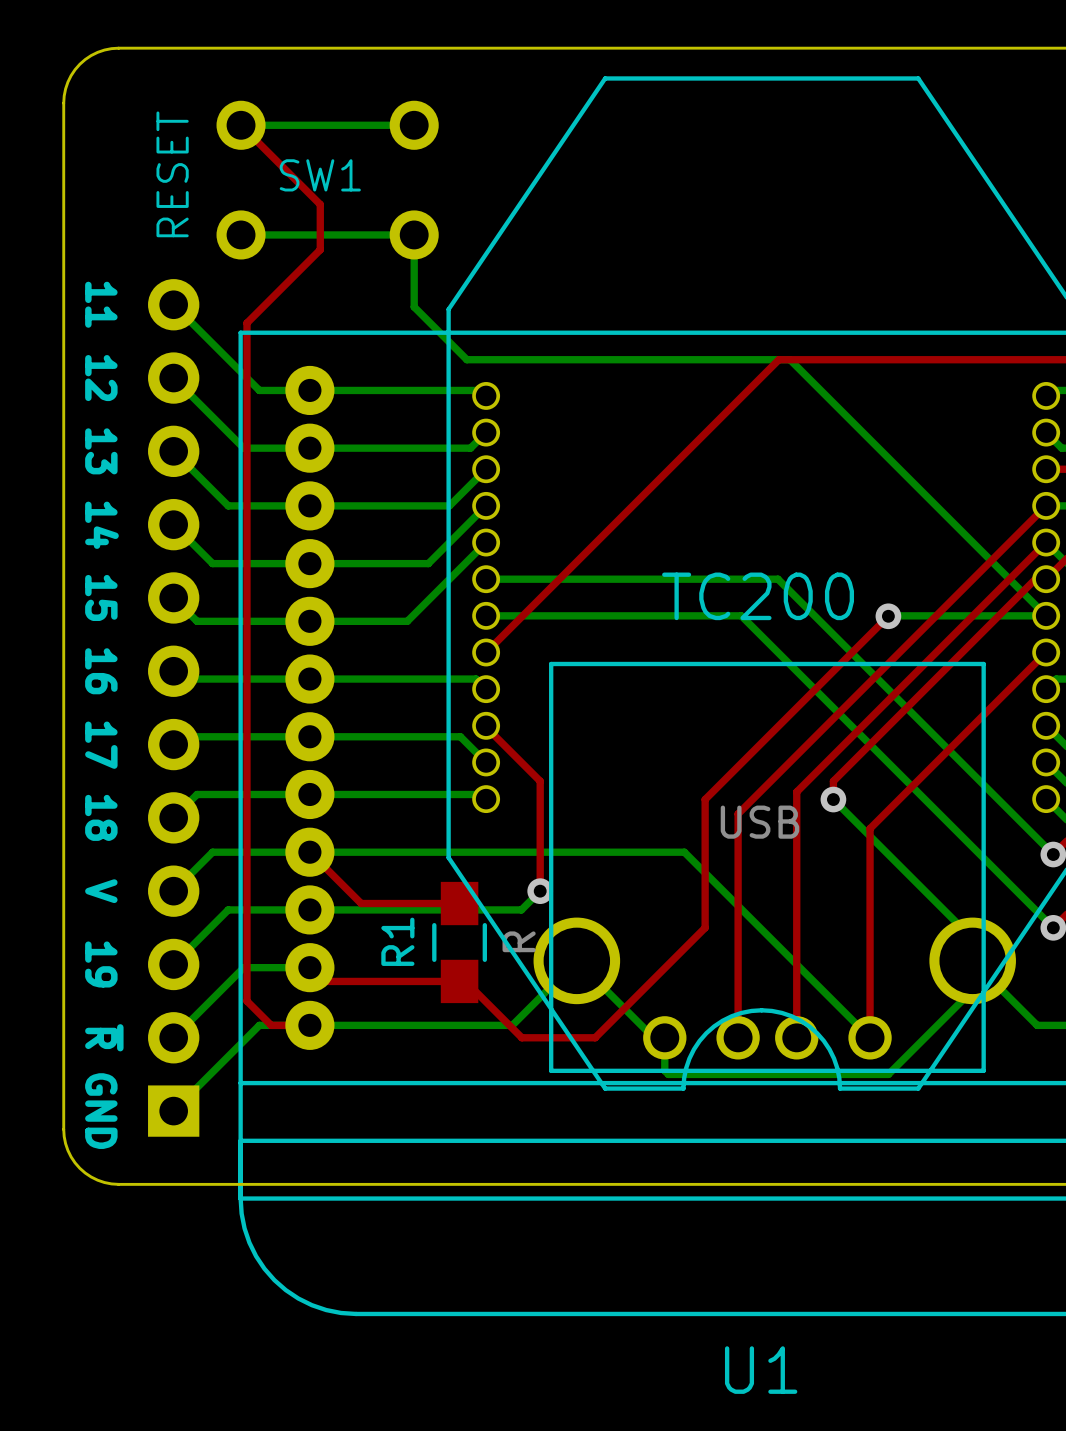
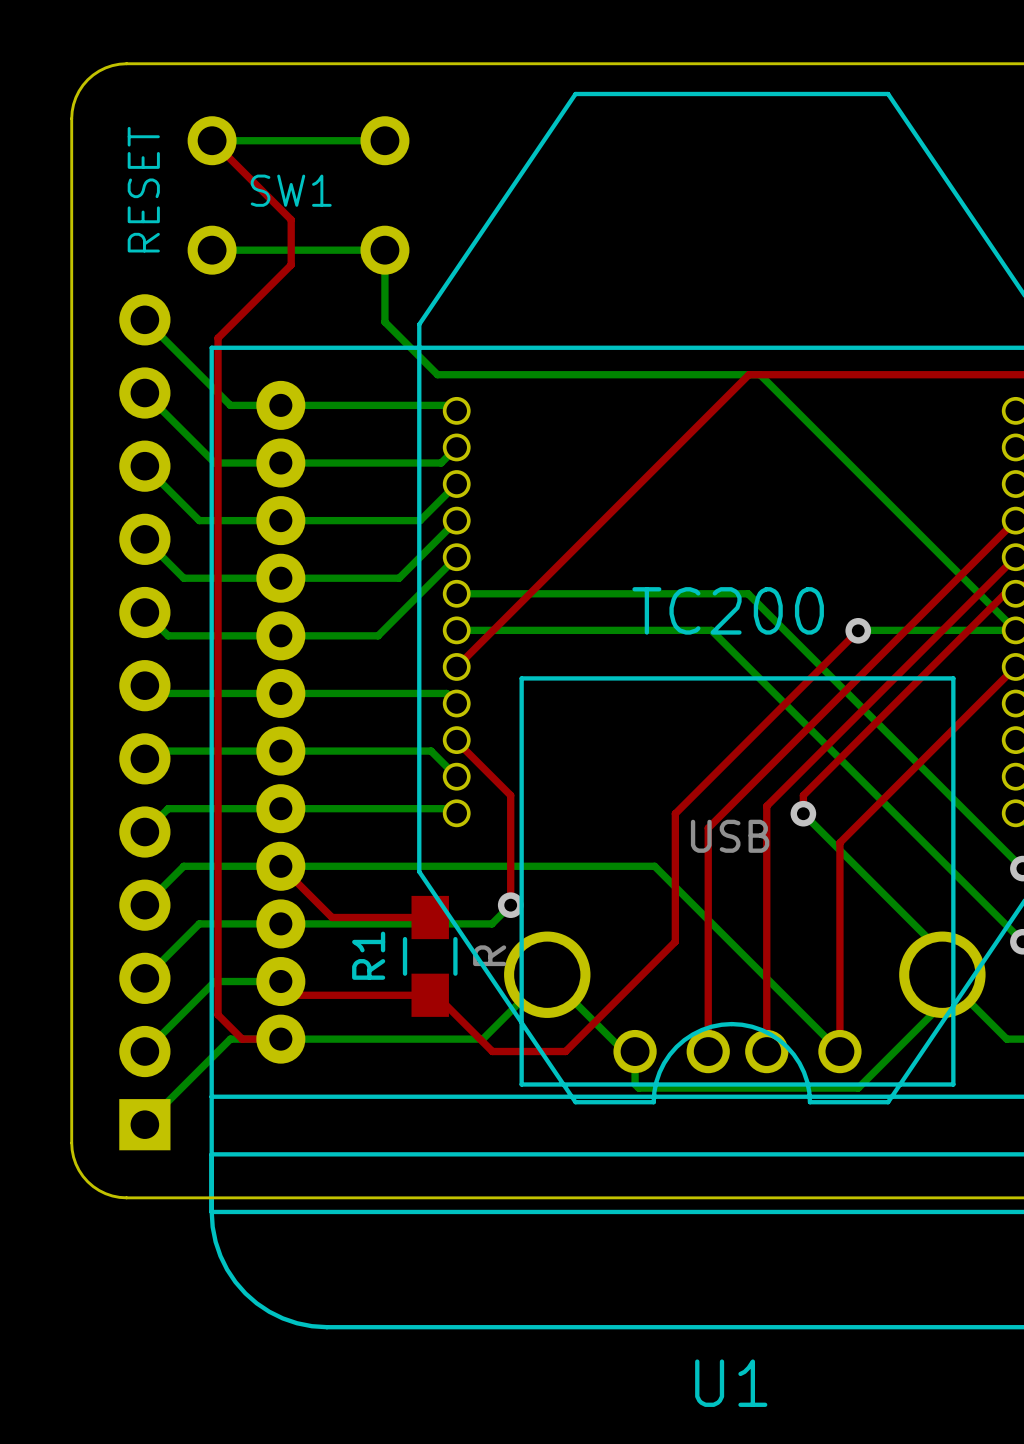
board edge: (155, 48) (111, 48) (91, 55) (79, 64) (71, 75) (65, 88) (63, 103) (64, 1136) (71, 1156) (79, 1168) (91, 1177) (111, 1183) (155, 1184) -> (126, 63) (105, 67) (87, 79) (75, 97) (71, 118) (71, 1142) (75, 1163) (87, 1181) (105, 1193) (126, 1197)
text: 11 (101, 304) -> none
text: 12 (101, 378) -> none
text: 13 (101, 451) -> none
text: 14 (101, 525) -> none
text: 15 (101, 597) -> none
text: 16 (101, 671) -> none
text: 17 (101, 745) -> none
text: 18 (101, 817) -> none
text: V (101, 891) -> none
text: 19 (101, 964) -> none
text: ~{R} (104, 1037) -> none
text: GND (101, 1111) -> none

